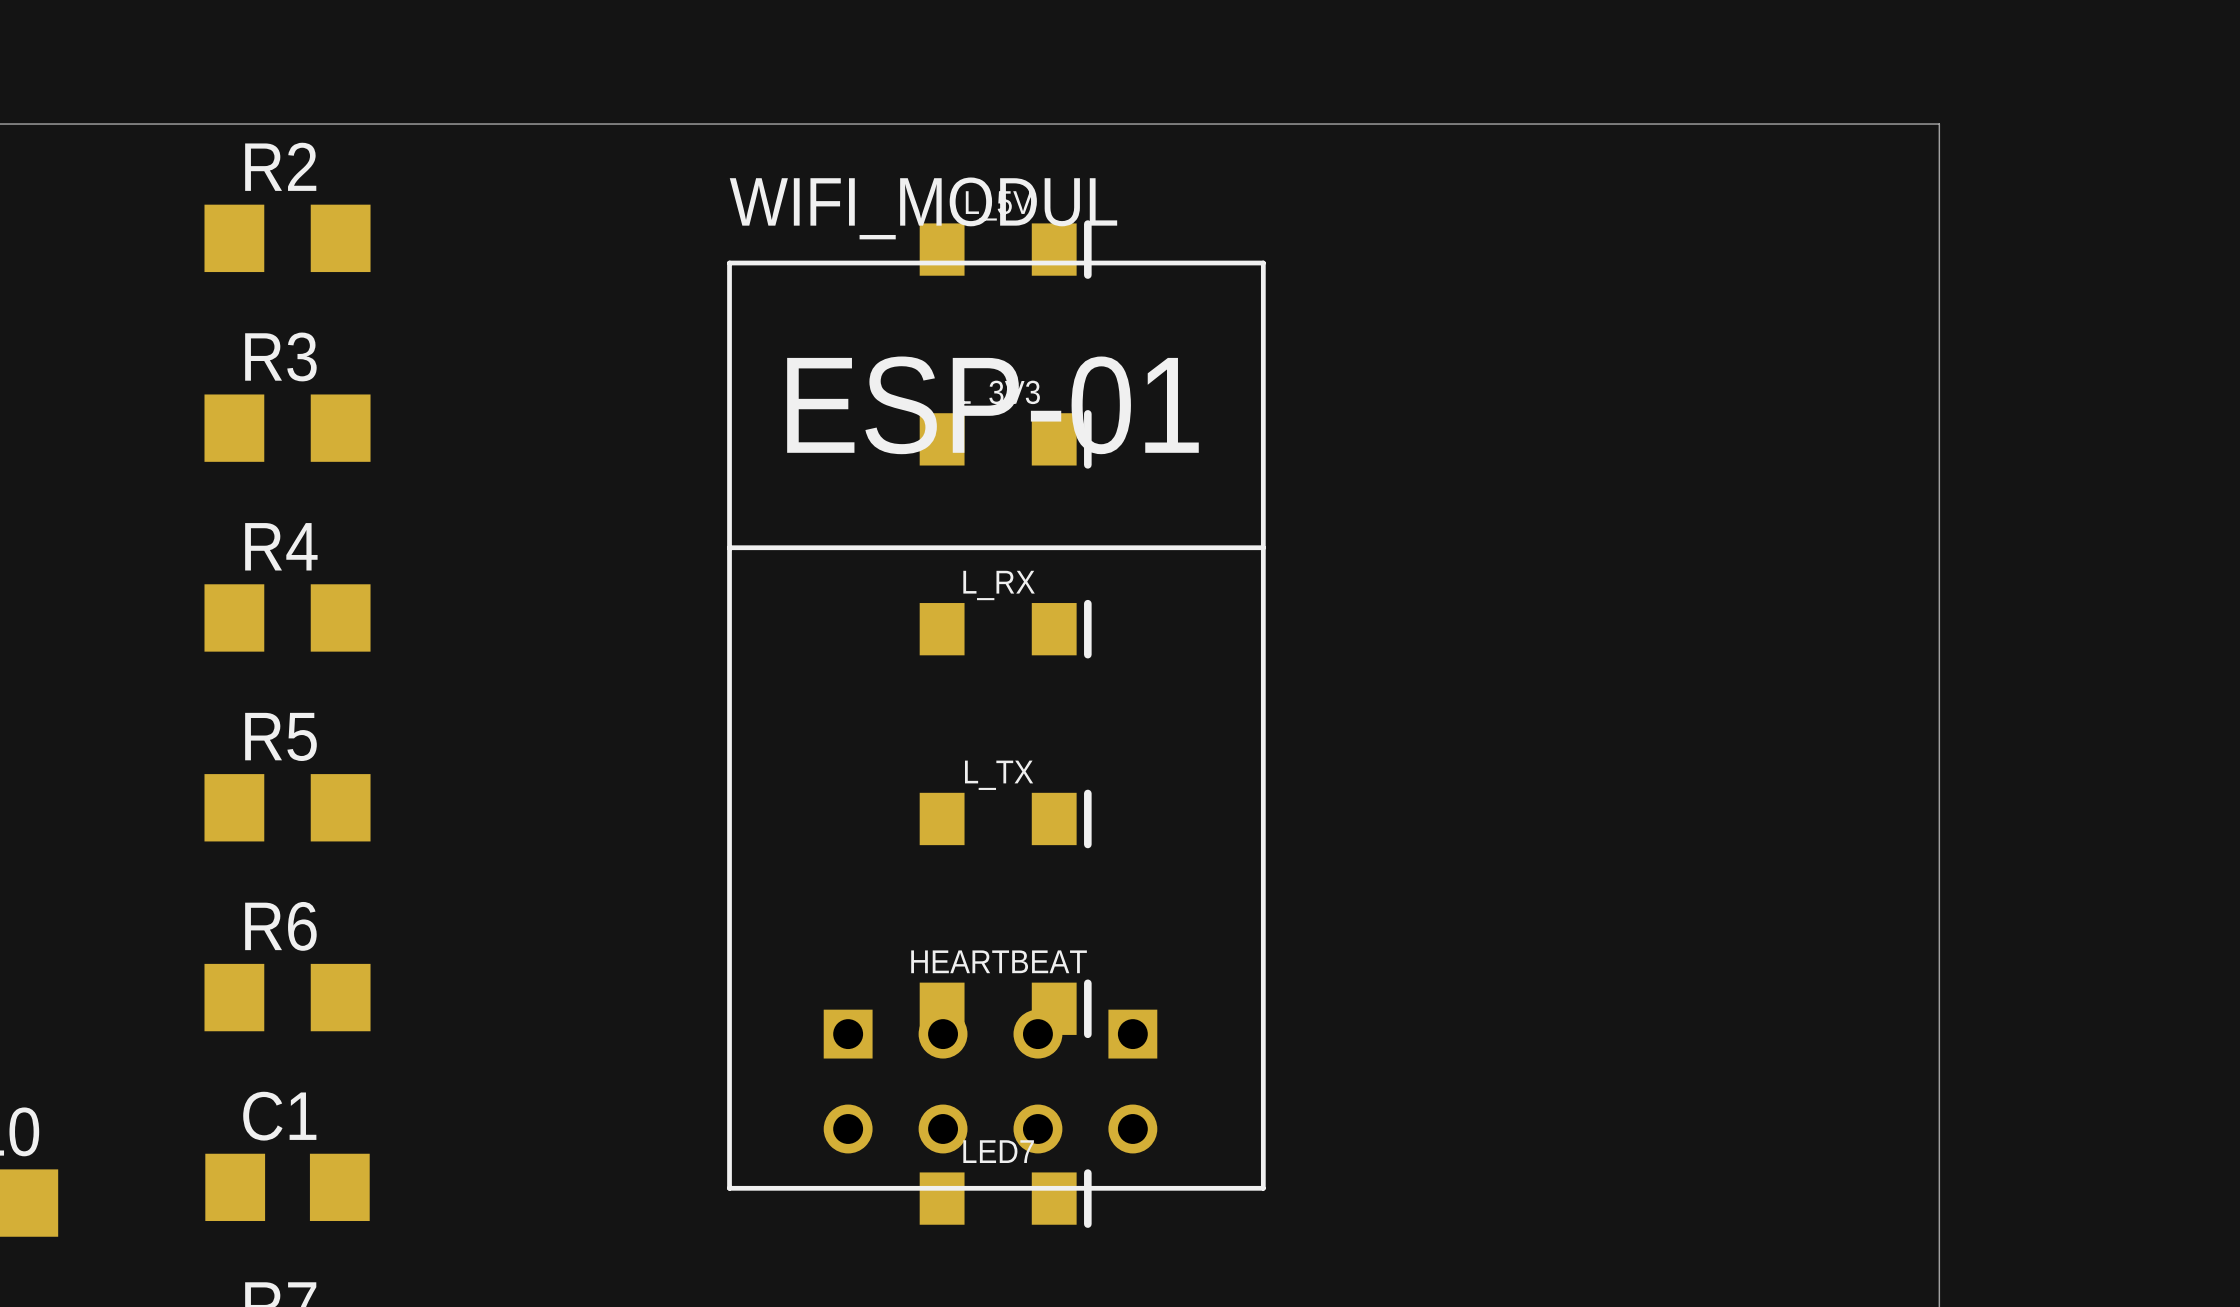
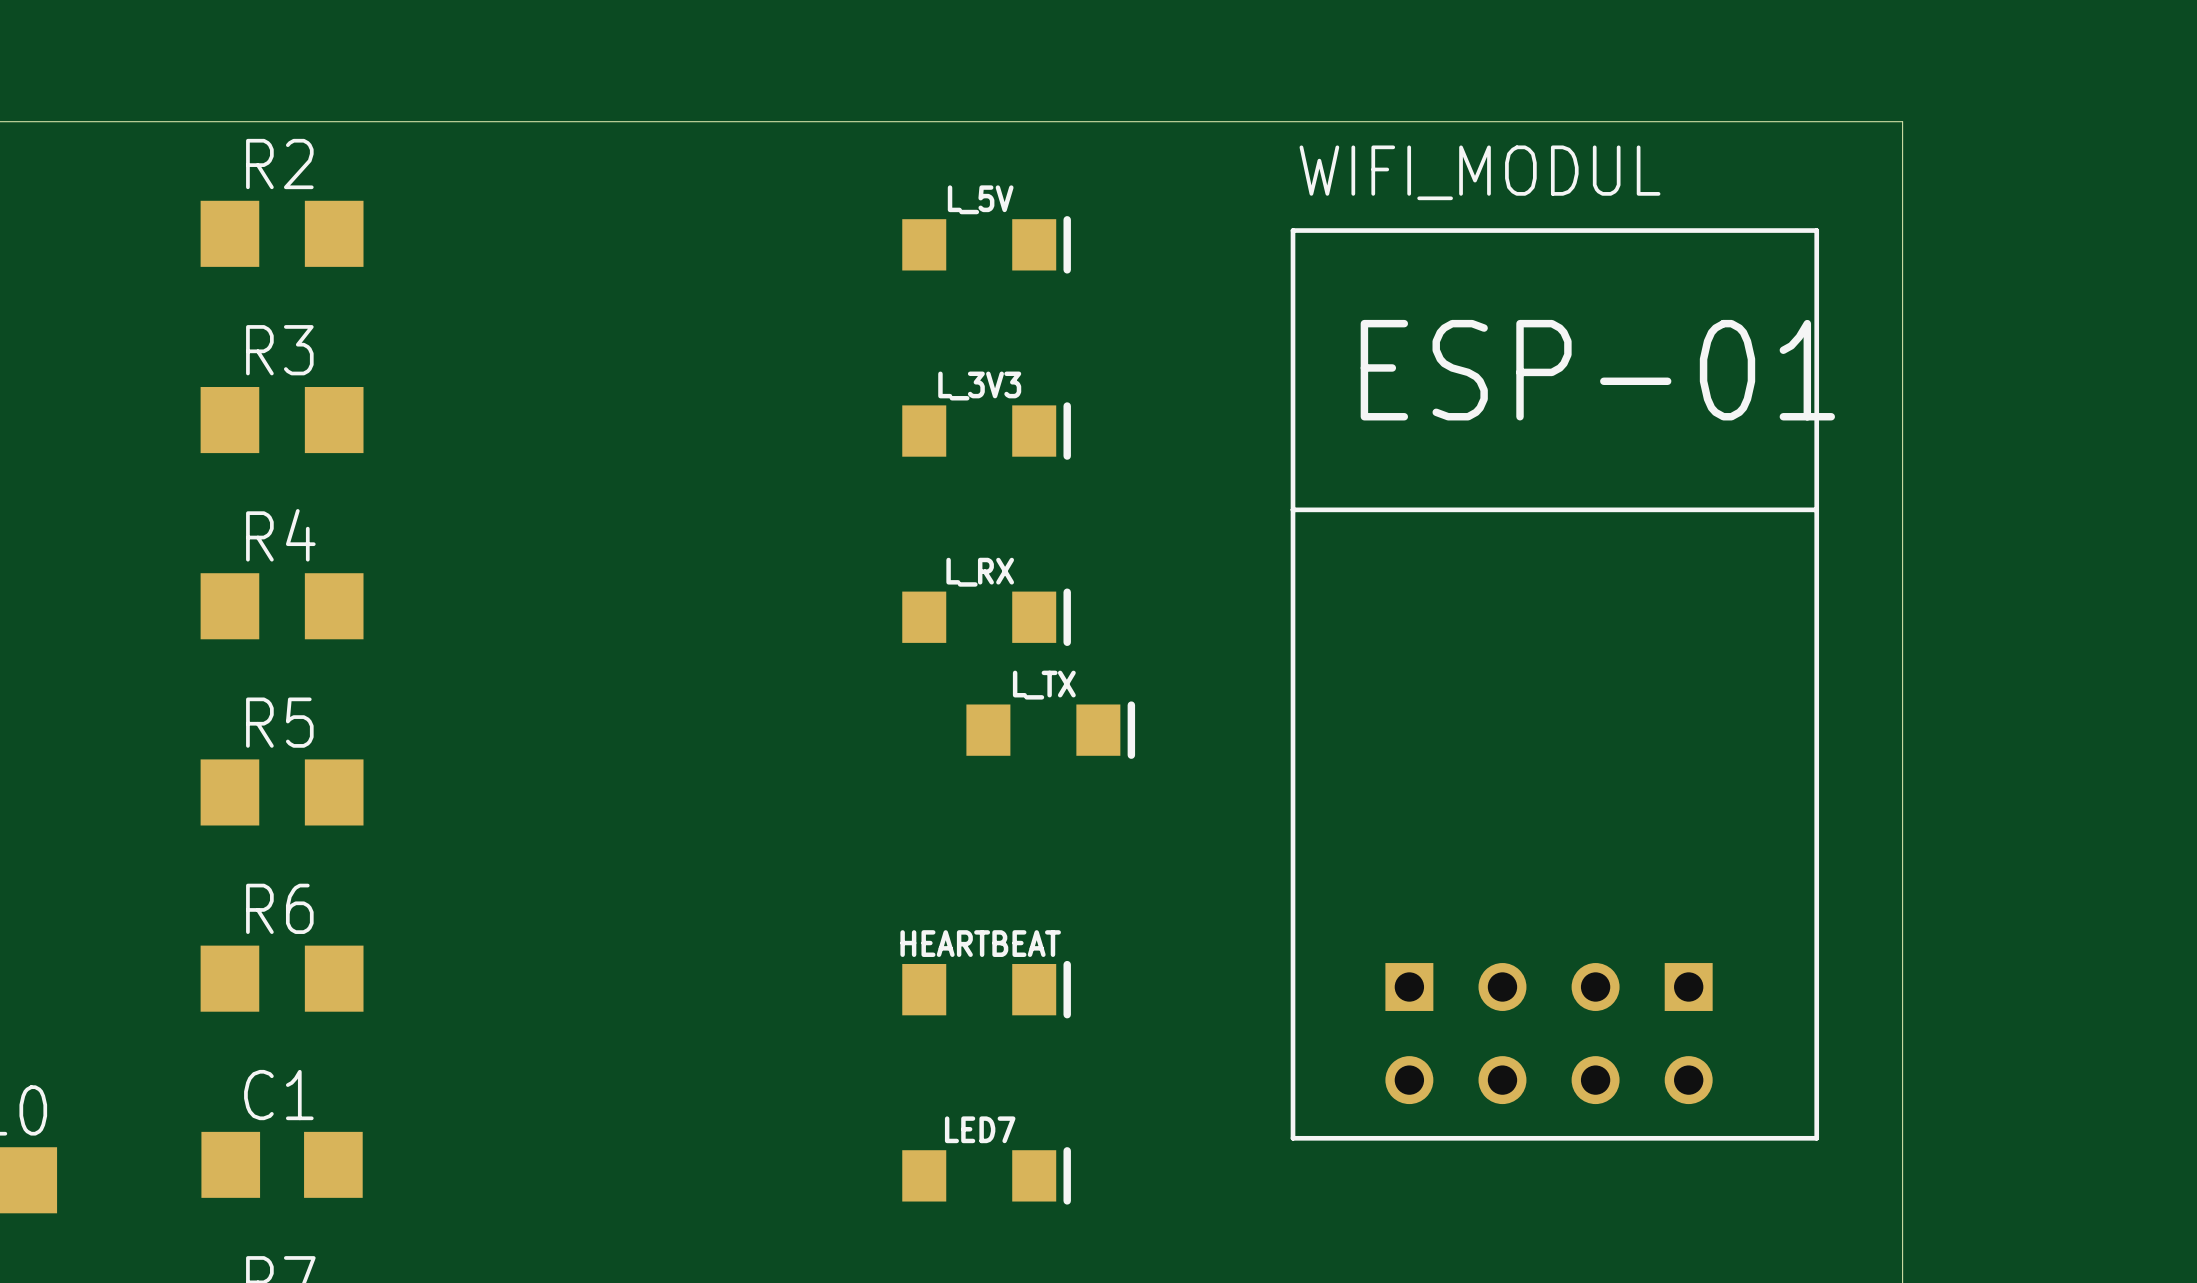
WIFI_MODUL position: (996, 725) -> (1554, 684)
L_TX position: (1005, 818) -> (1050, 730)

